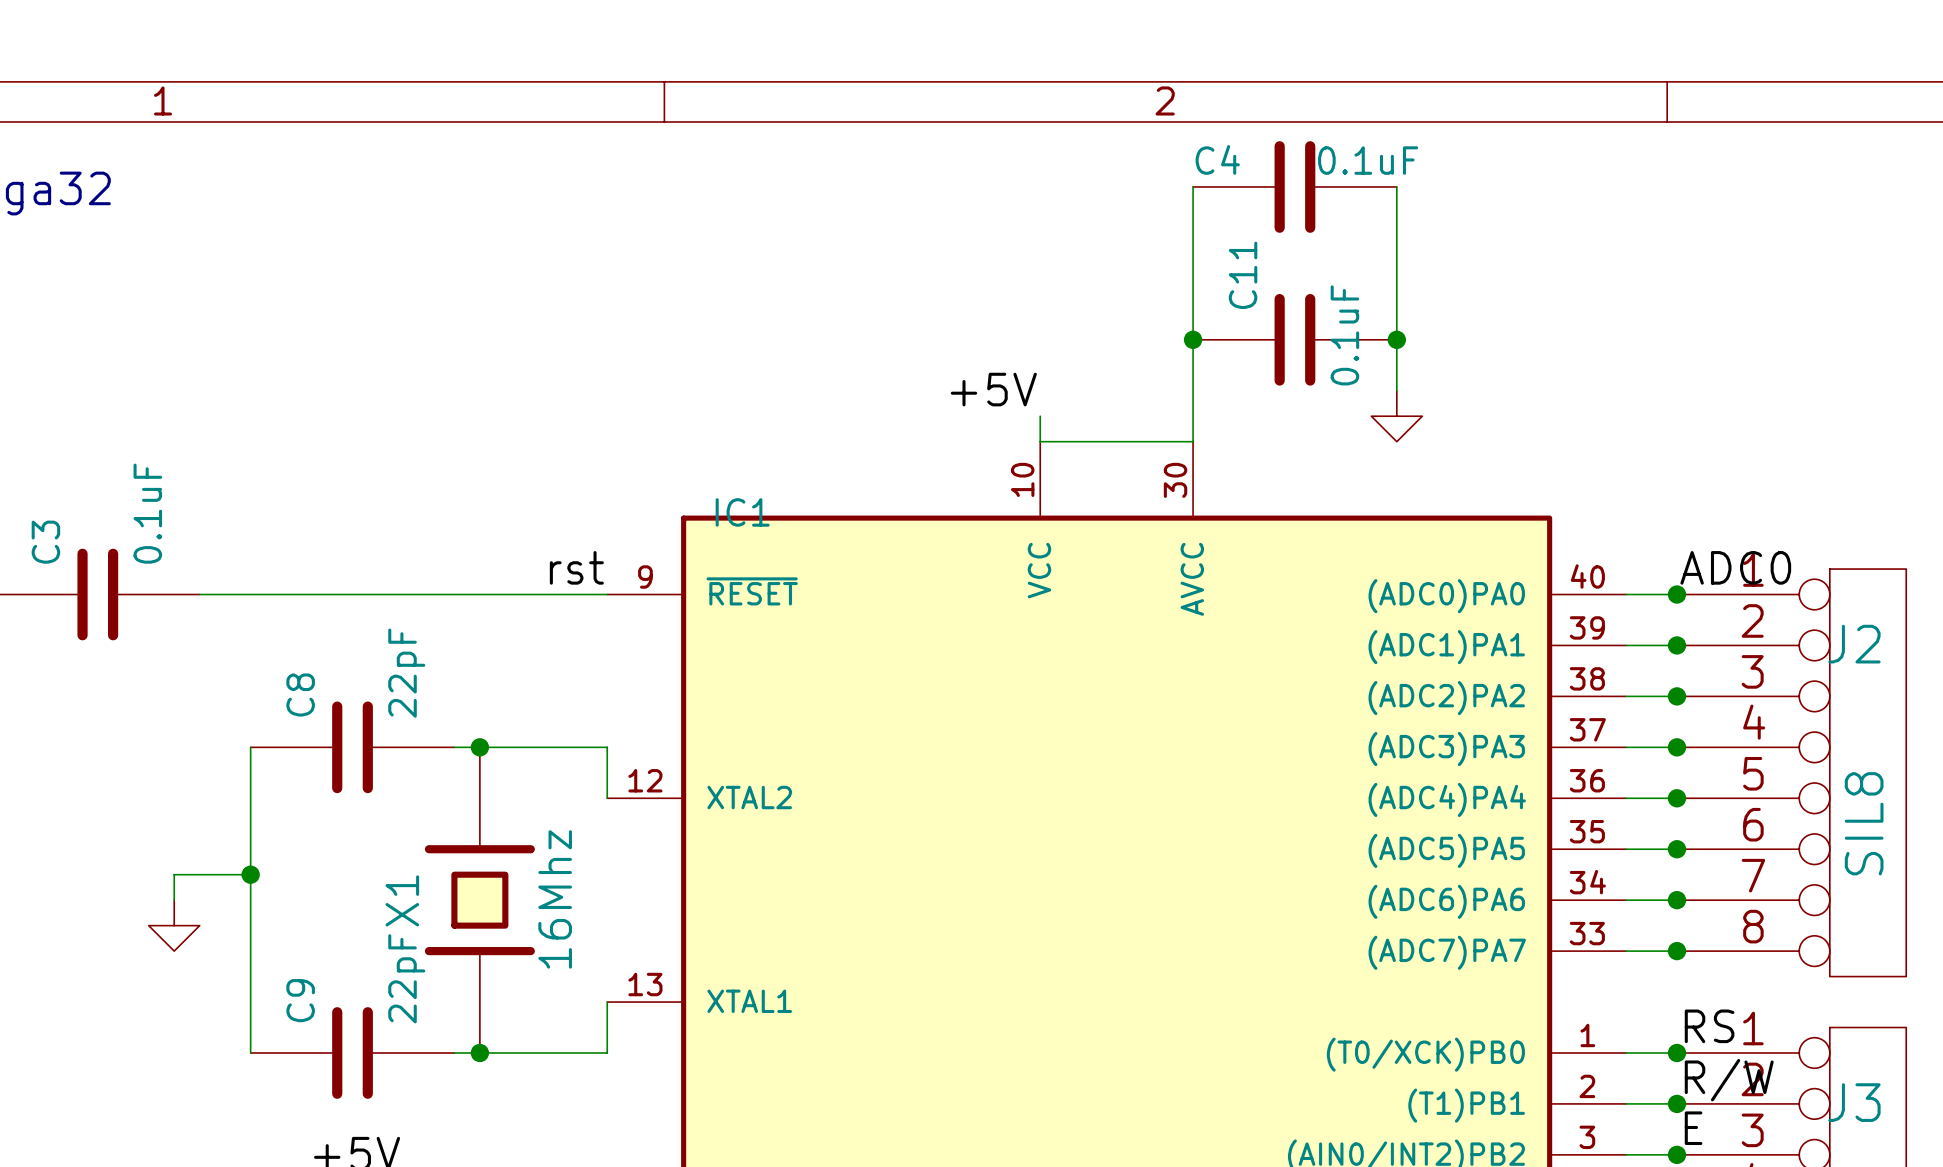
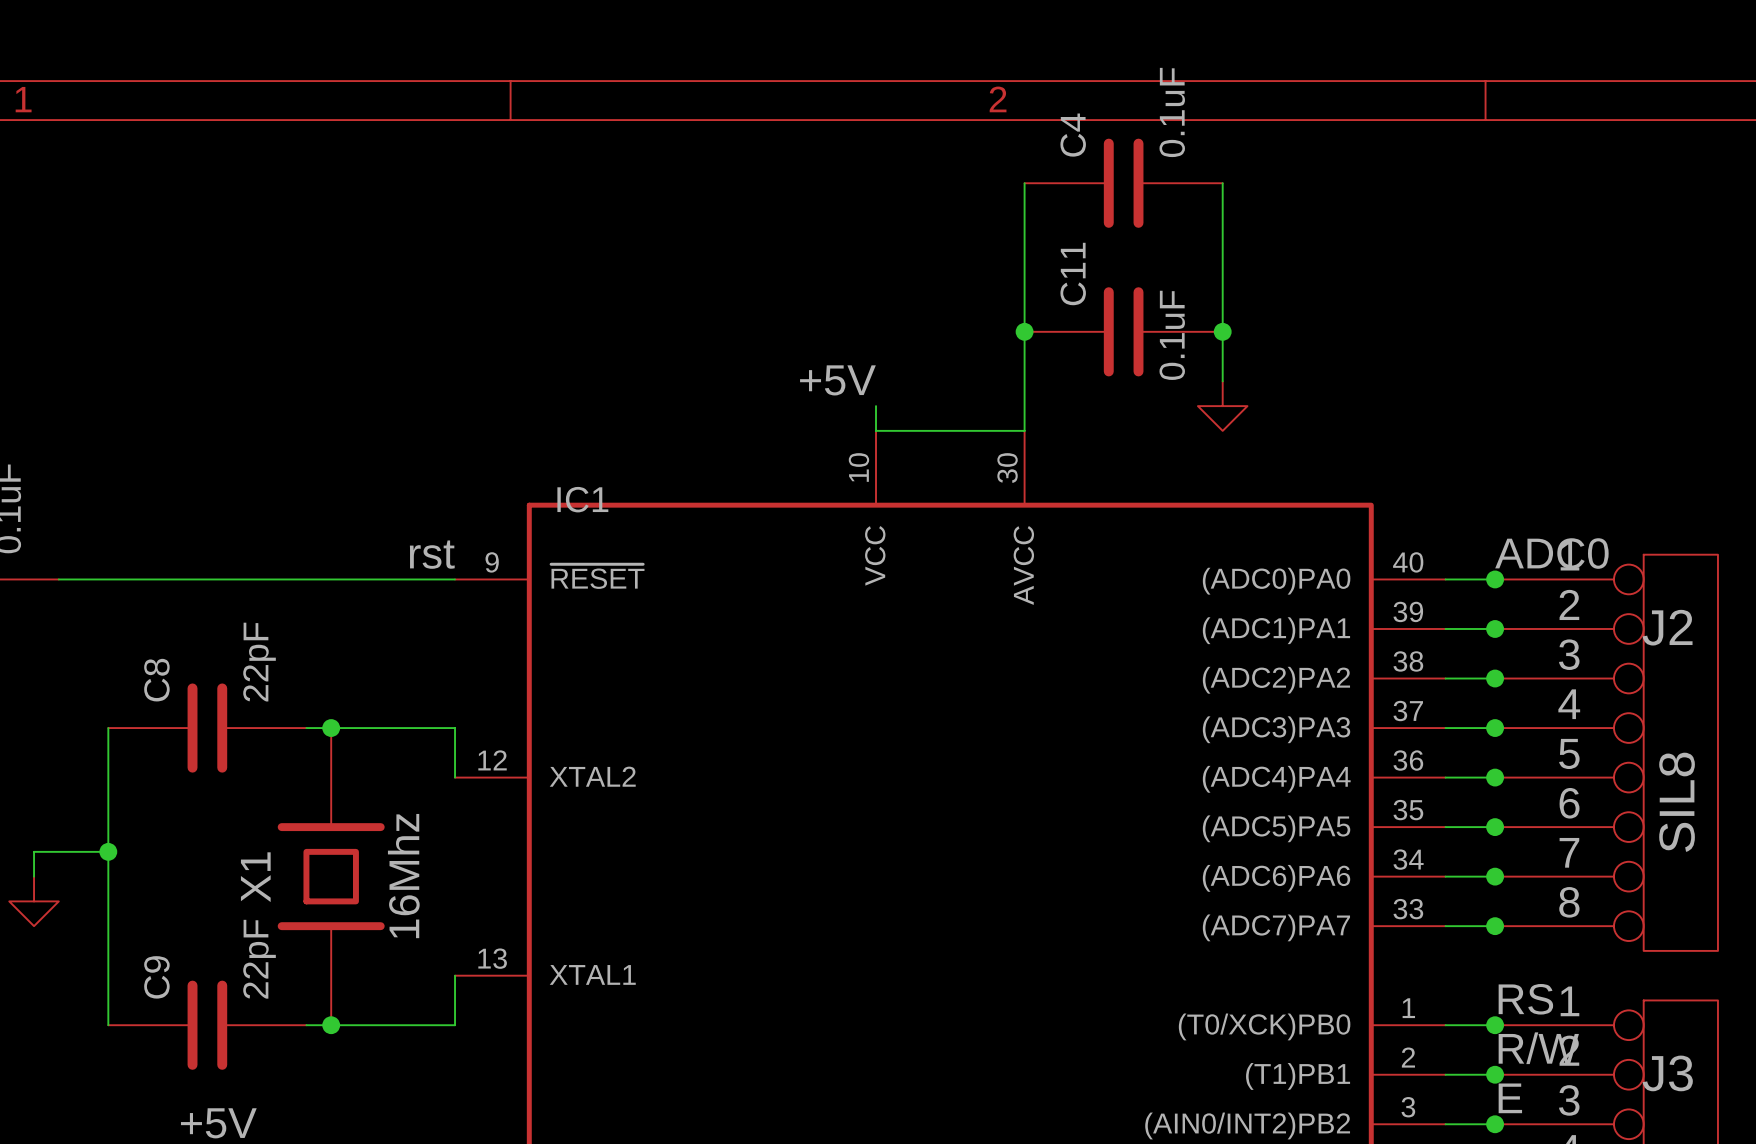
C4 name rotation: 0° (1217, 159) -> 90° counterclockwise (1073, 135)
C4 value rotation: 0° (1368, 160) -> 90° counterclockwise (1172, 112)

